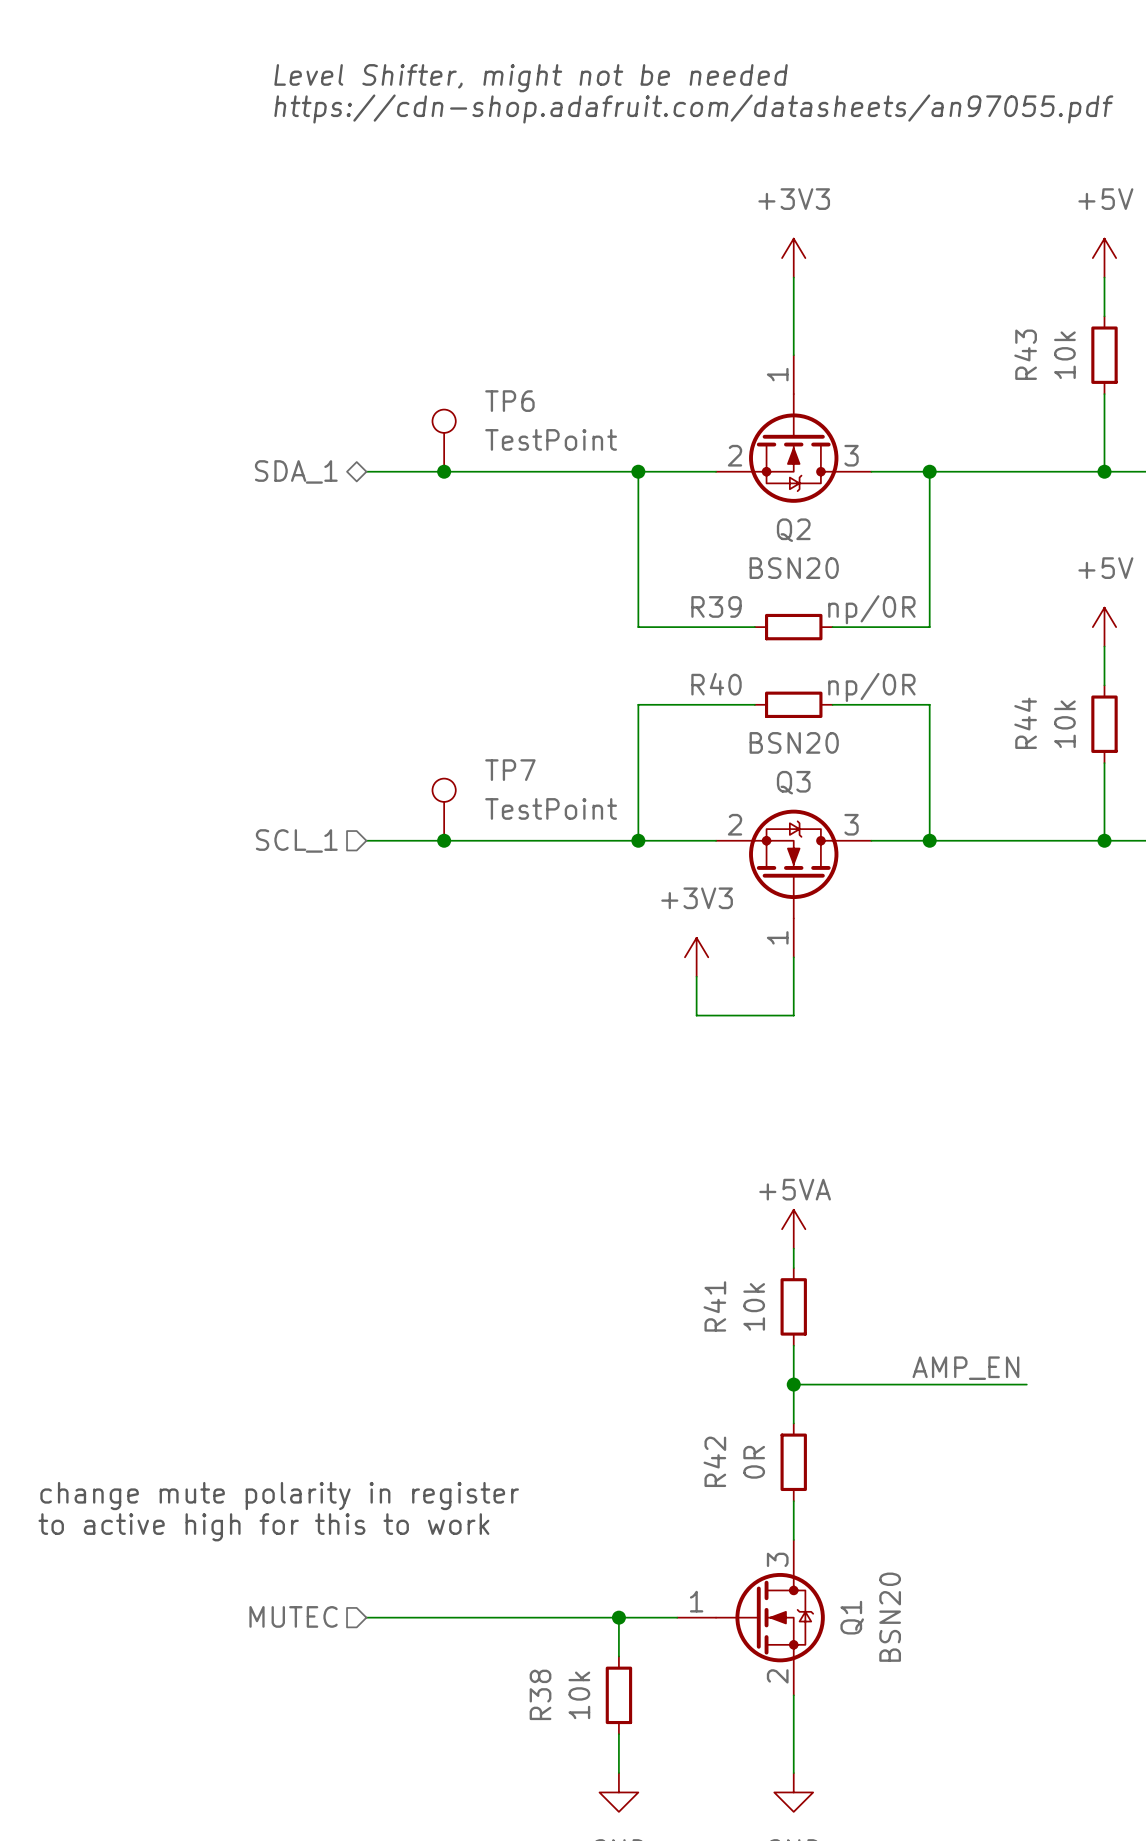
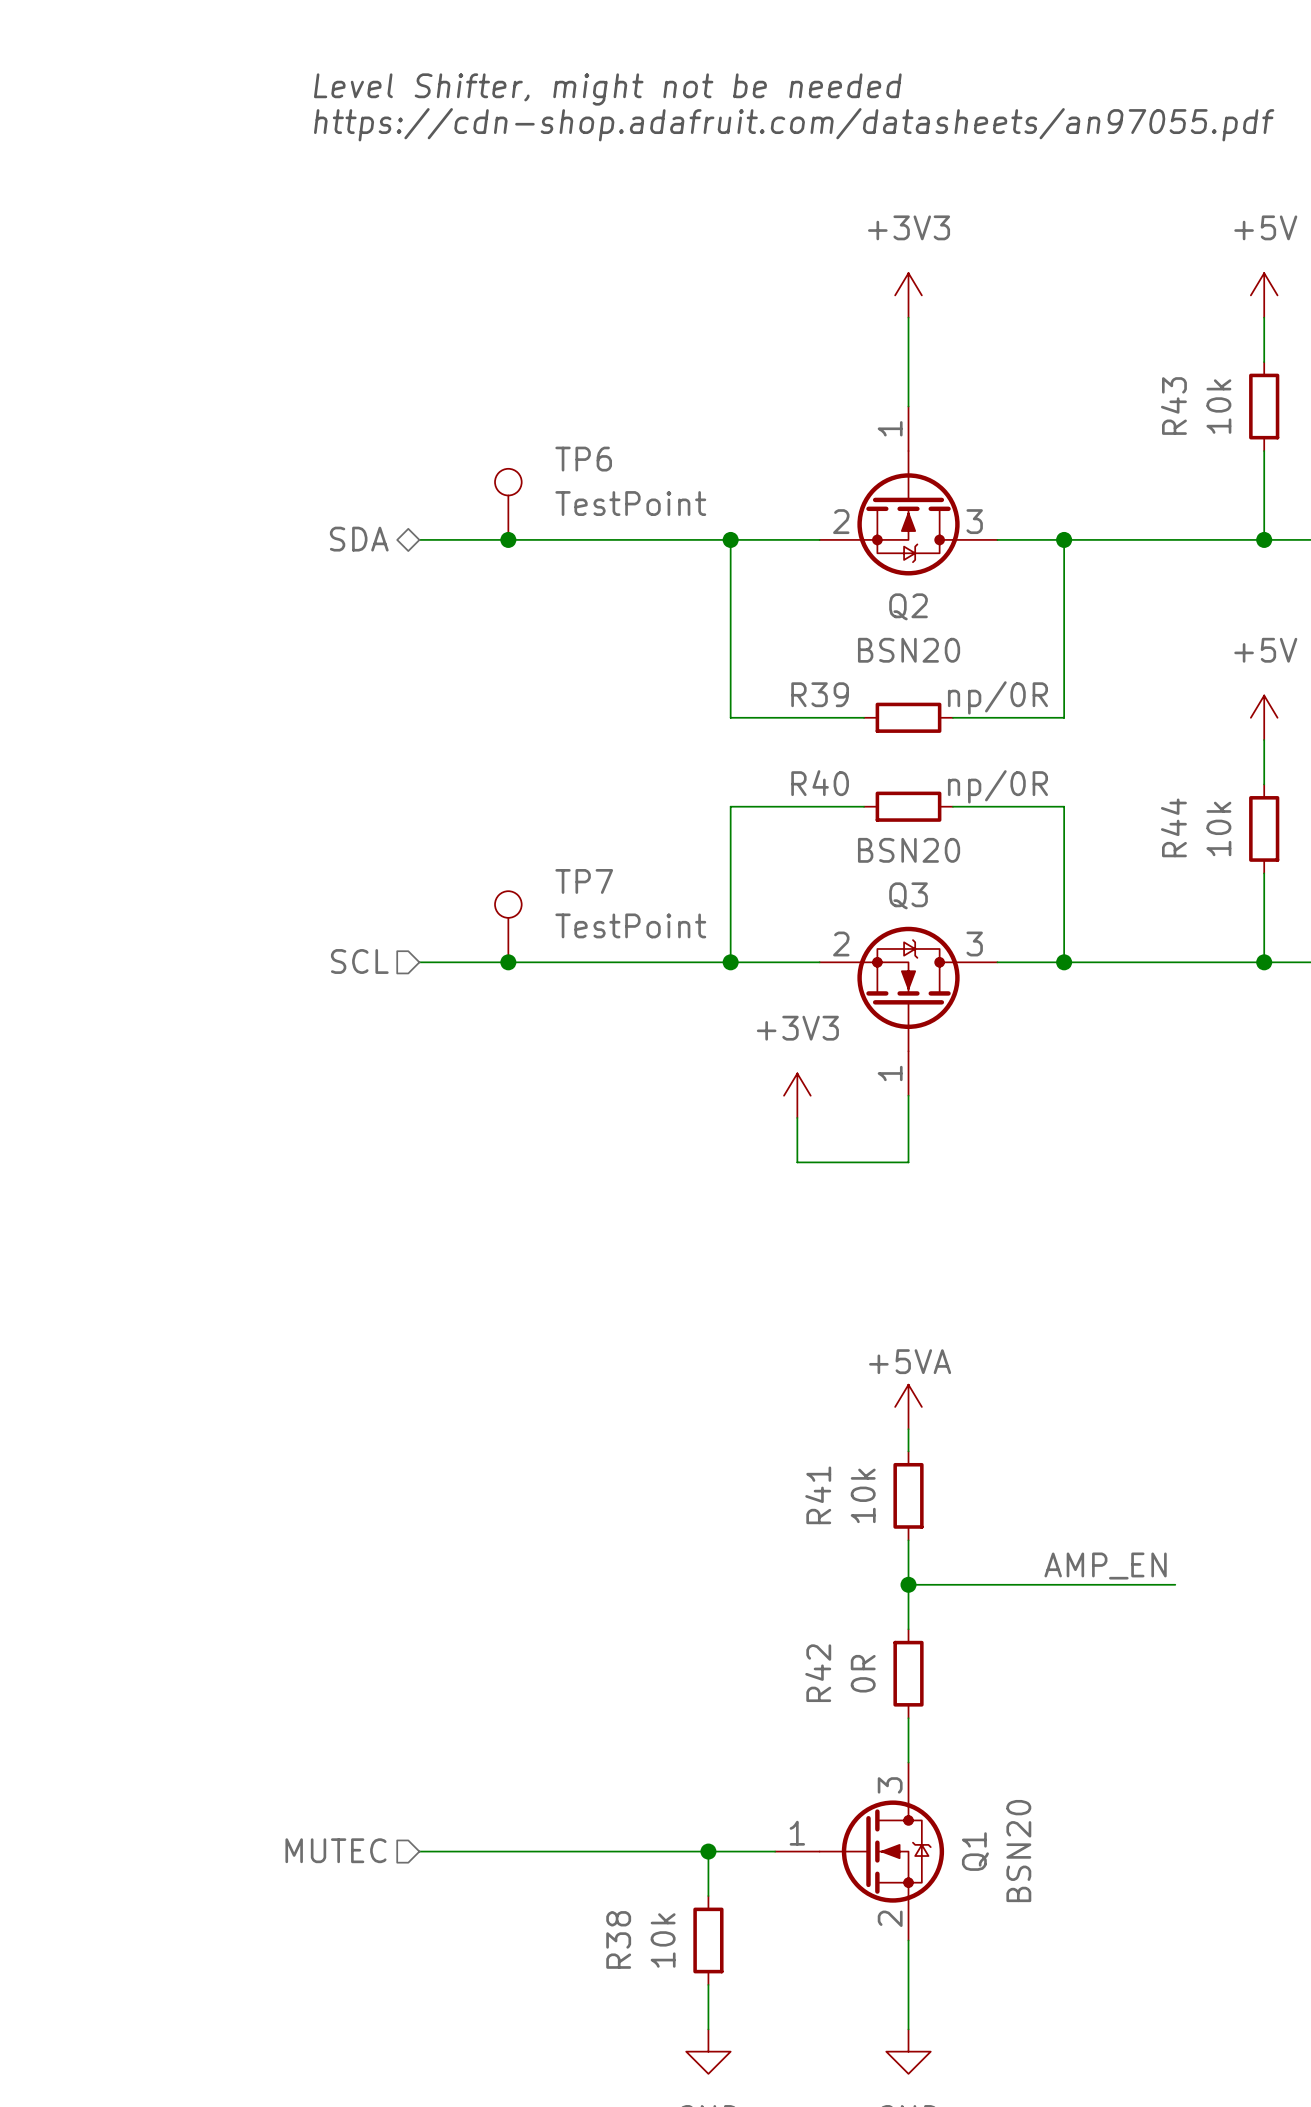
hierarchical label: SDA_1 (296, 471) -> SDA (359, 539)
hierarchical label: SCL_1 (296, 840) -> SCL (359, 961)
text: change mute polarity in register (279, 1496) -> none
text: to active high for this to work (263, 1527) -> none

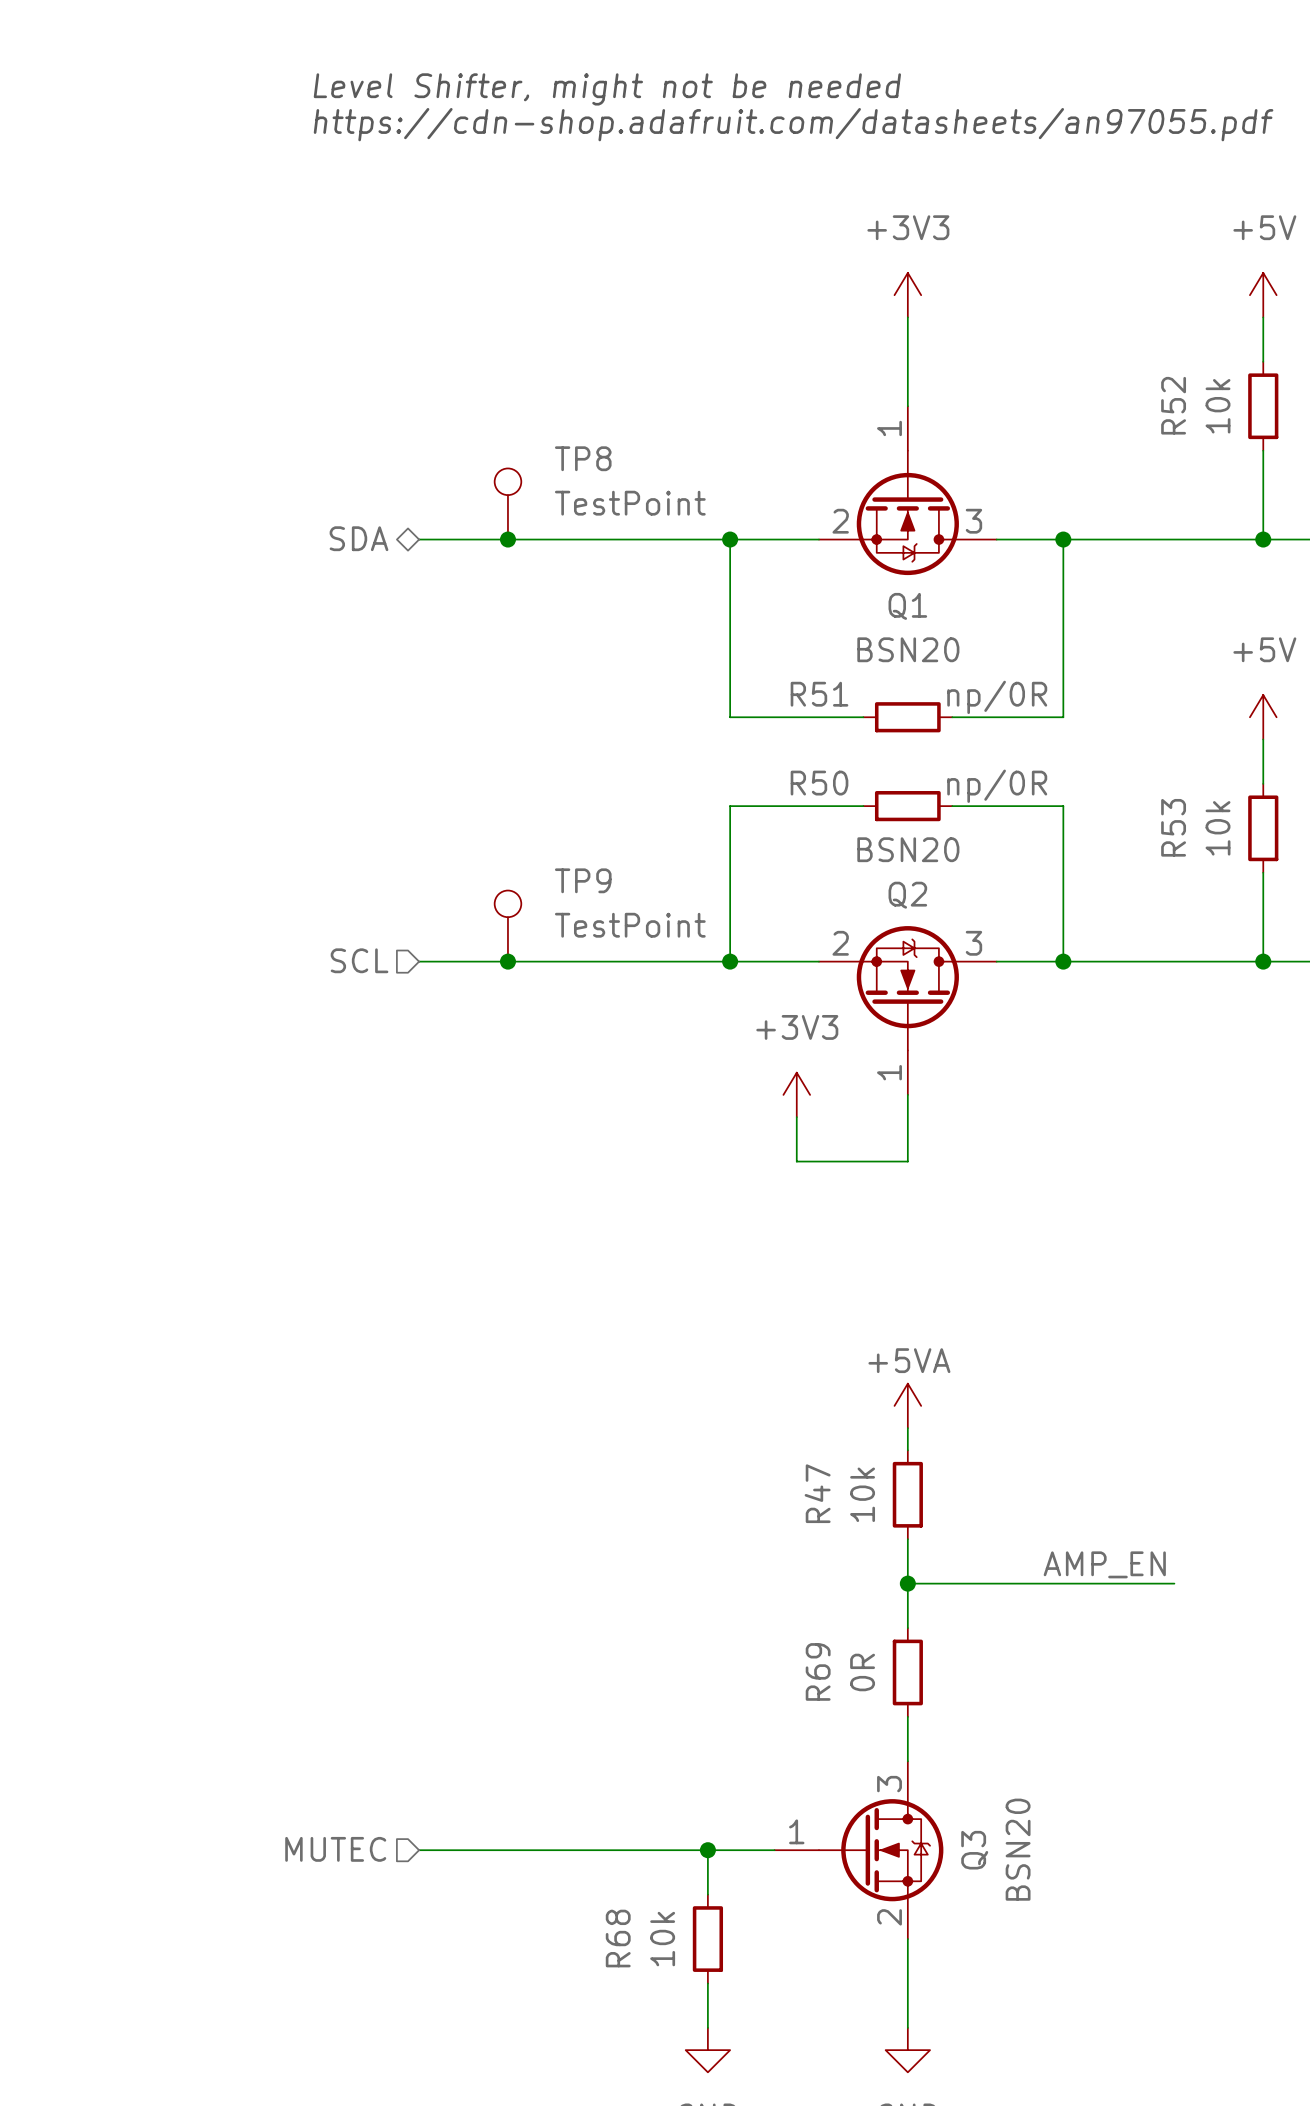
R43 name: R43 (1173, 406) -> R52 (1173, 405)
TP6 name: TP6 (583, 459) -> TP8 (583, 458)
Q2 name: Q2 (908, 606) -> Q1 (907, 606)
R39 name: R39 (820, 694) -> R51 (819, 694)
R40 name: R40 (820, 783) -> R50 (819, 783)
R44 name: R44 (1173, 827) -> R53 (1173, 827)
TP7 name: TP7 (584, 881) -> TP9 (583, 880)
Q3 name: Q3 (908, 895) -> Q2 (907, 895)
R41 name: R41 (818, 1495) -> R47 (817, 1493)
R42 name: R42 (818, 1673) -> R69 (818, 1671)
Q1 name: Q1 (975, 1851) -> Q3 (974, 1850)
R38 name: R38 (618, 1939) -> R68 (618, 1938)

